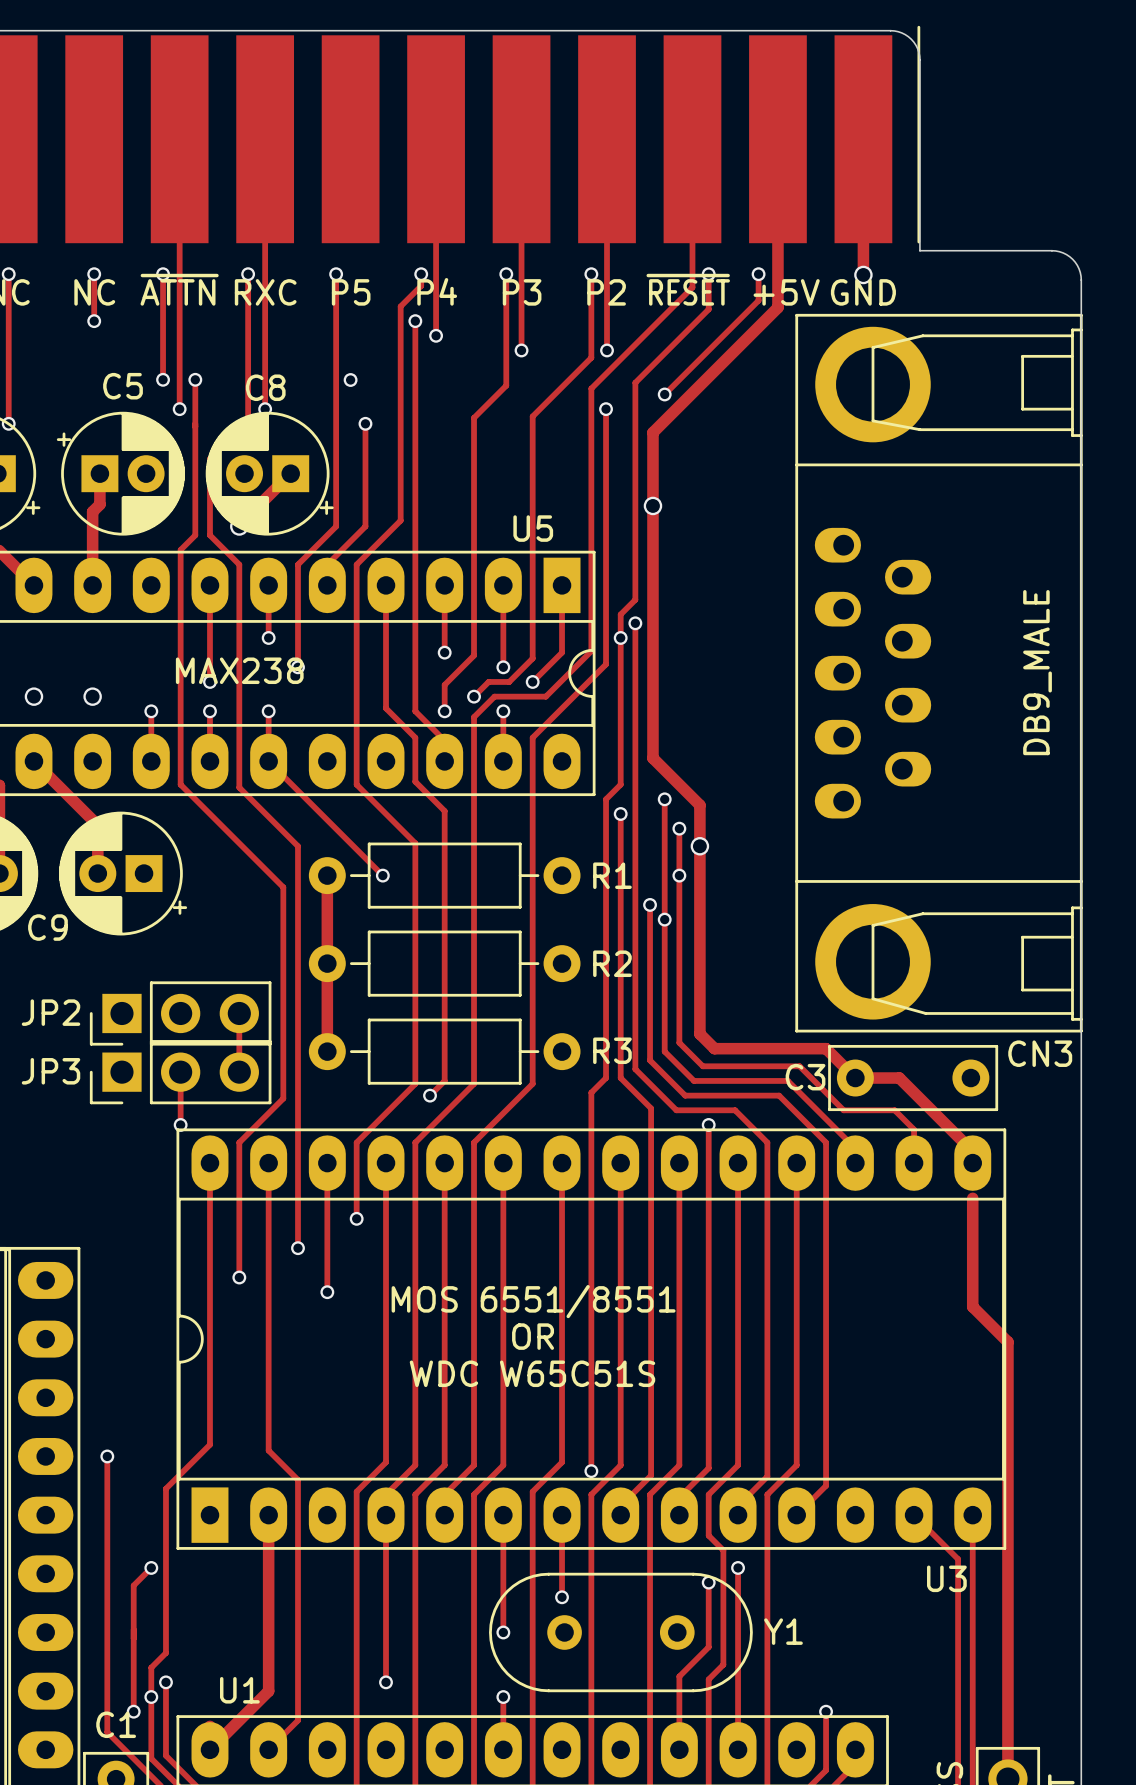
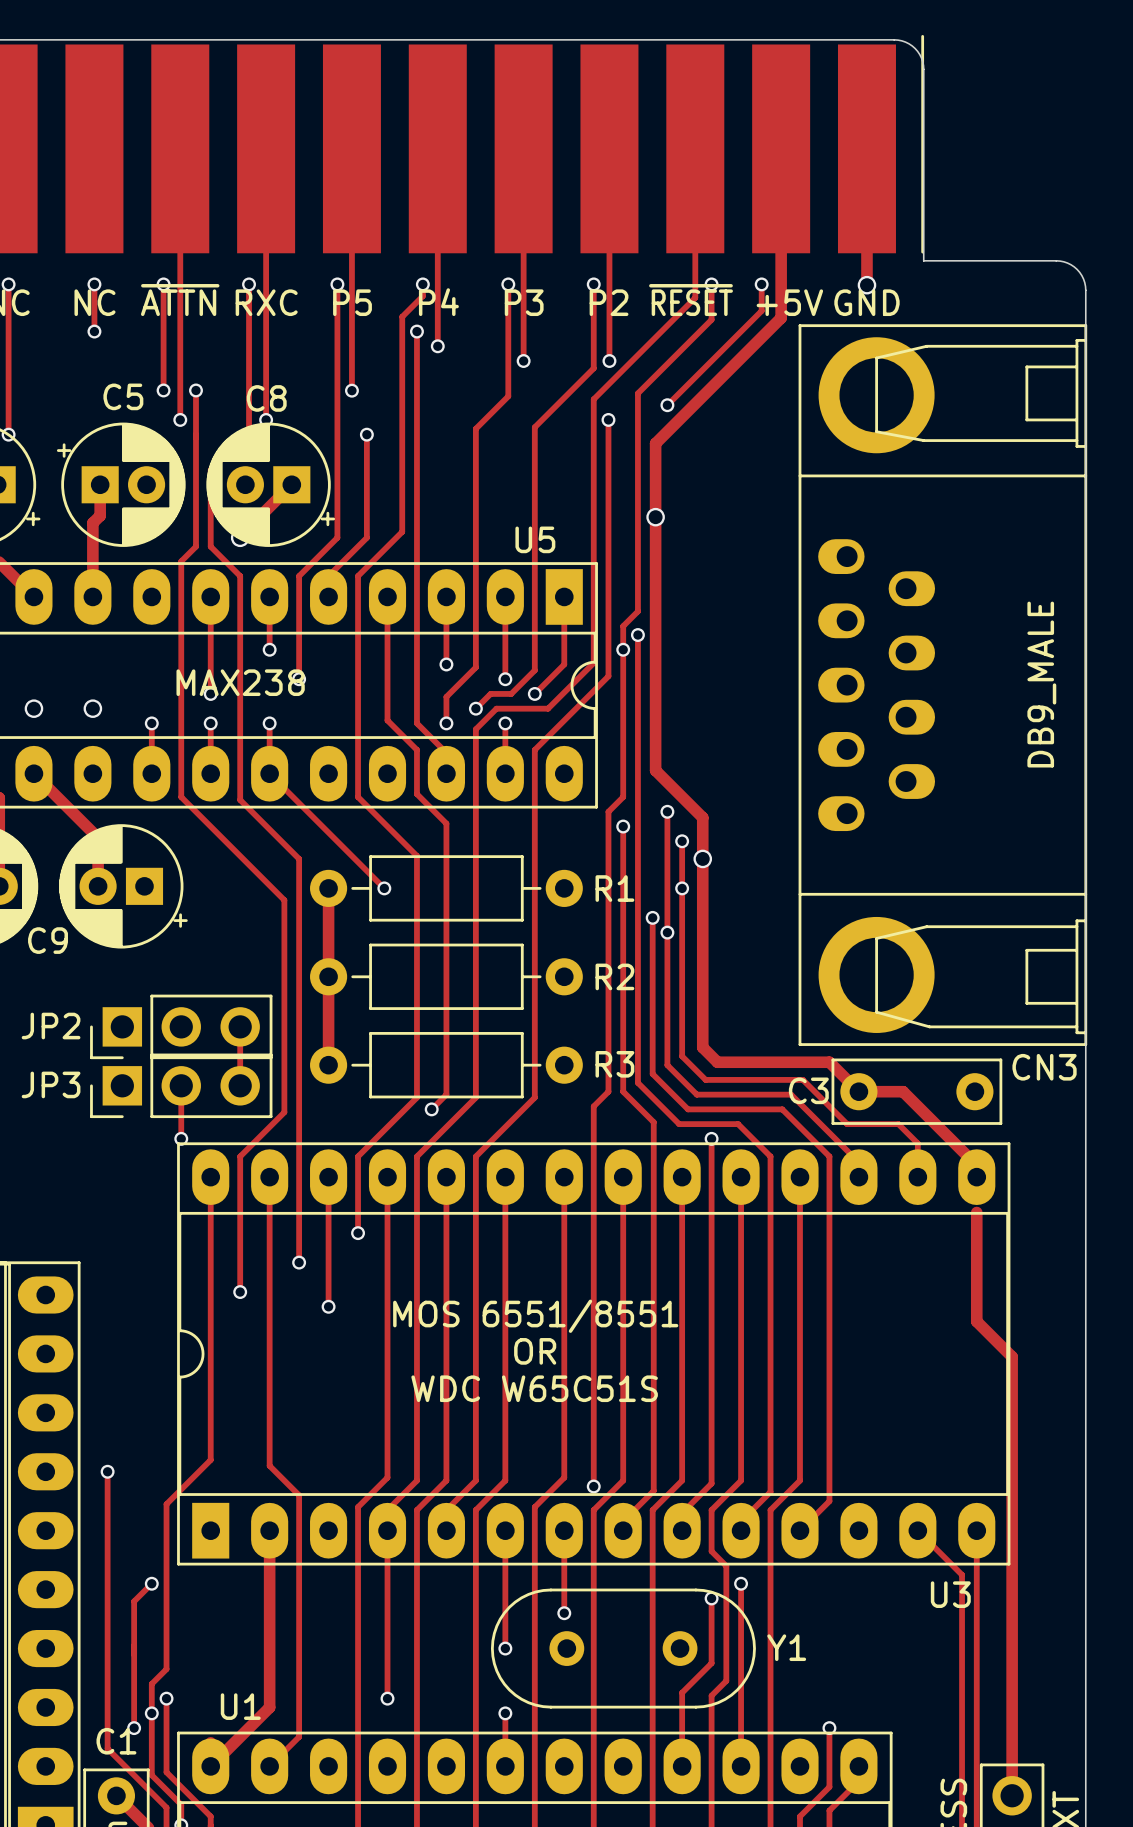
track: none -> (351, 148) (351, 390)

